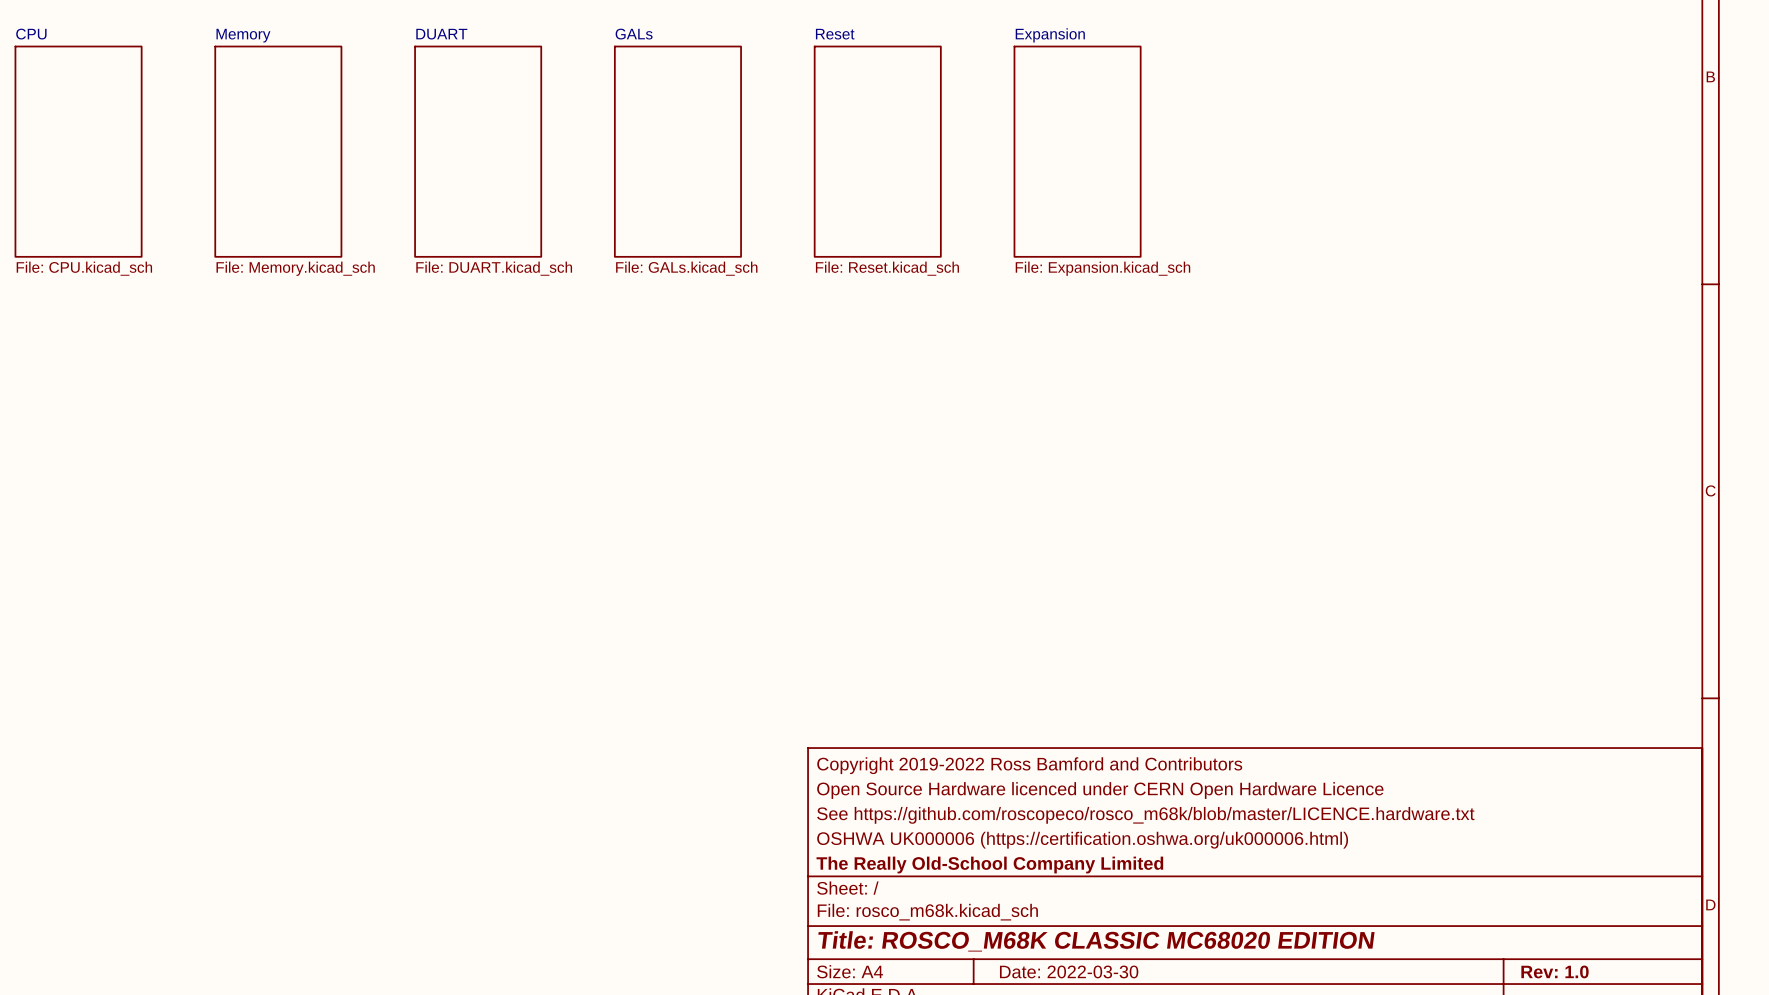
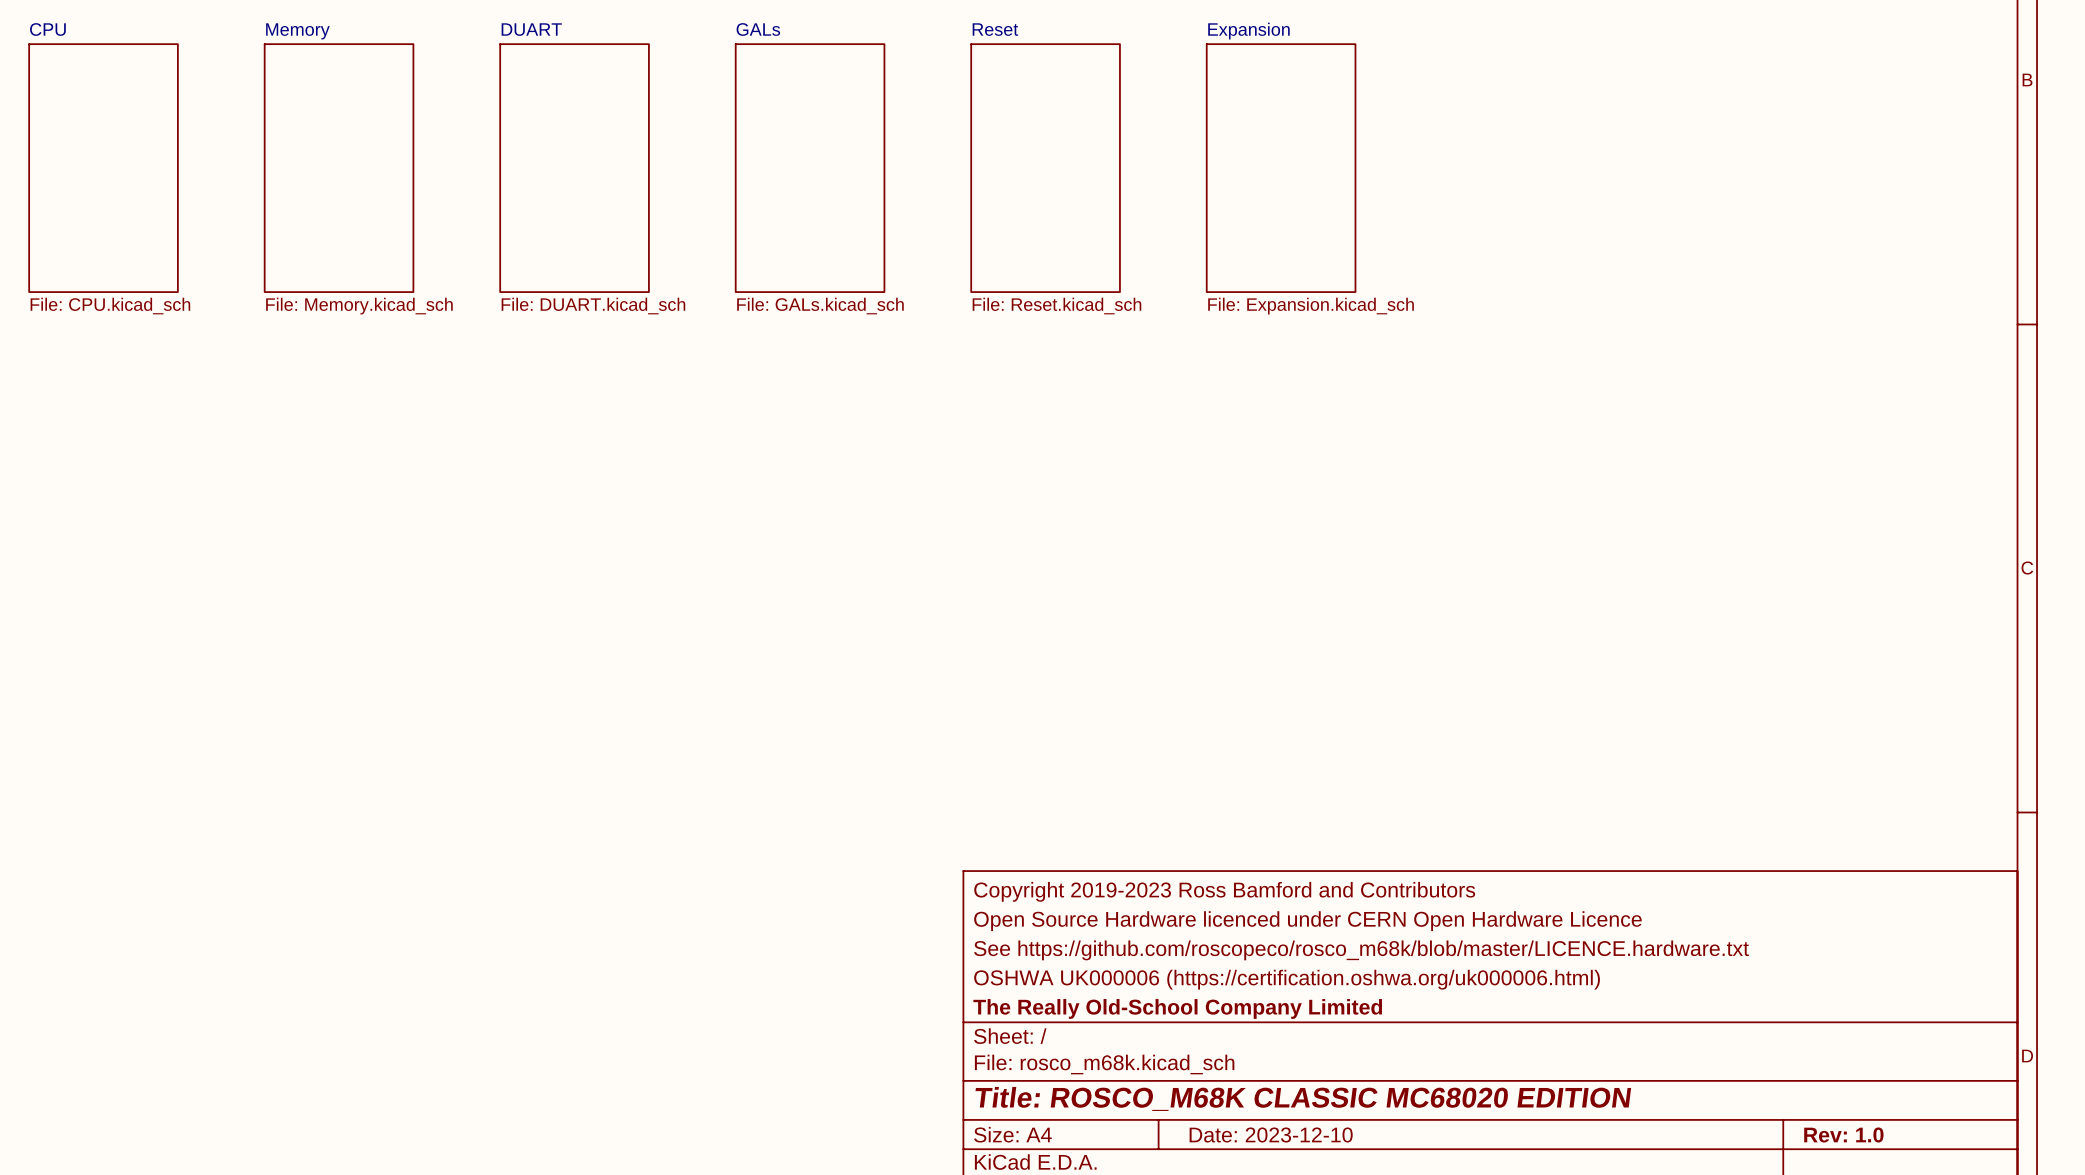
title block: Copyright 2019-2022 Ross Bamford and Contributors (1029, 765) -> Copyright 2019-2023 Ross Bamford and Contributors (1224, 891)
title block: Date: 2022-03-30 (1069, 971) -> Date: 2023-12-10 (1271, 1135)

